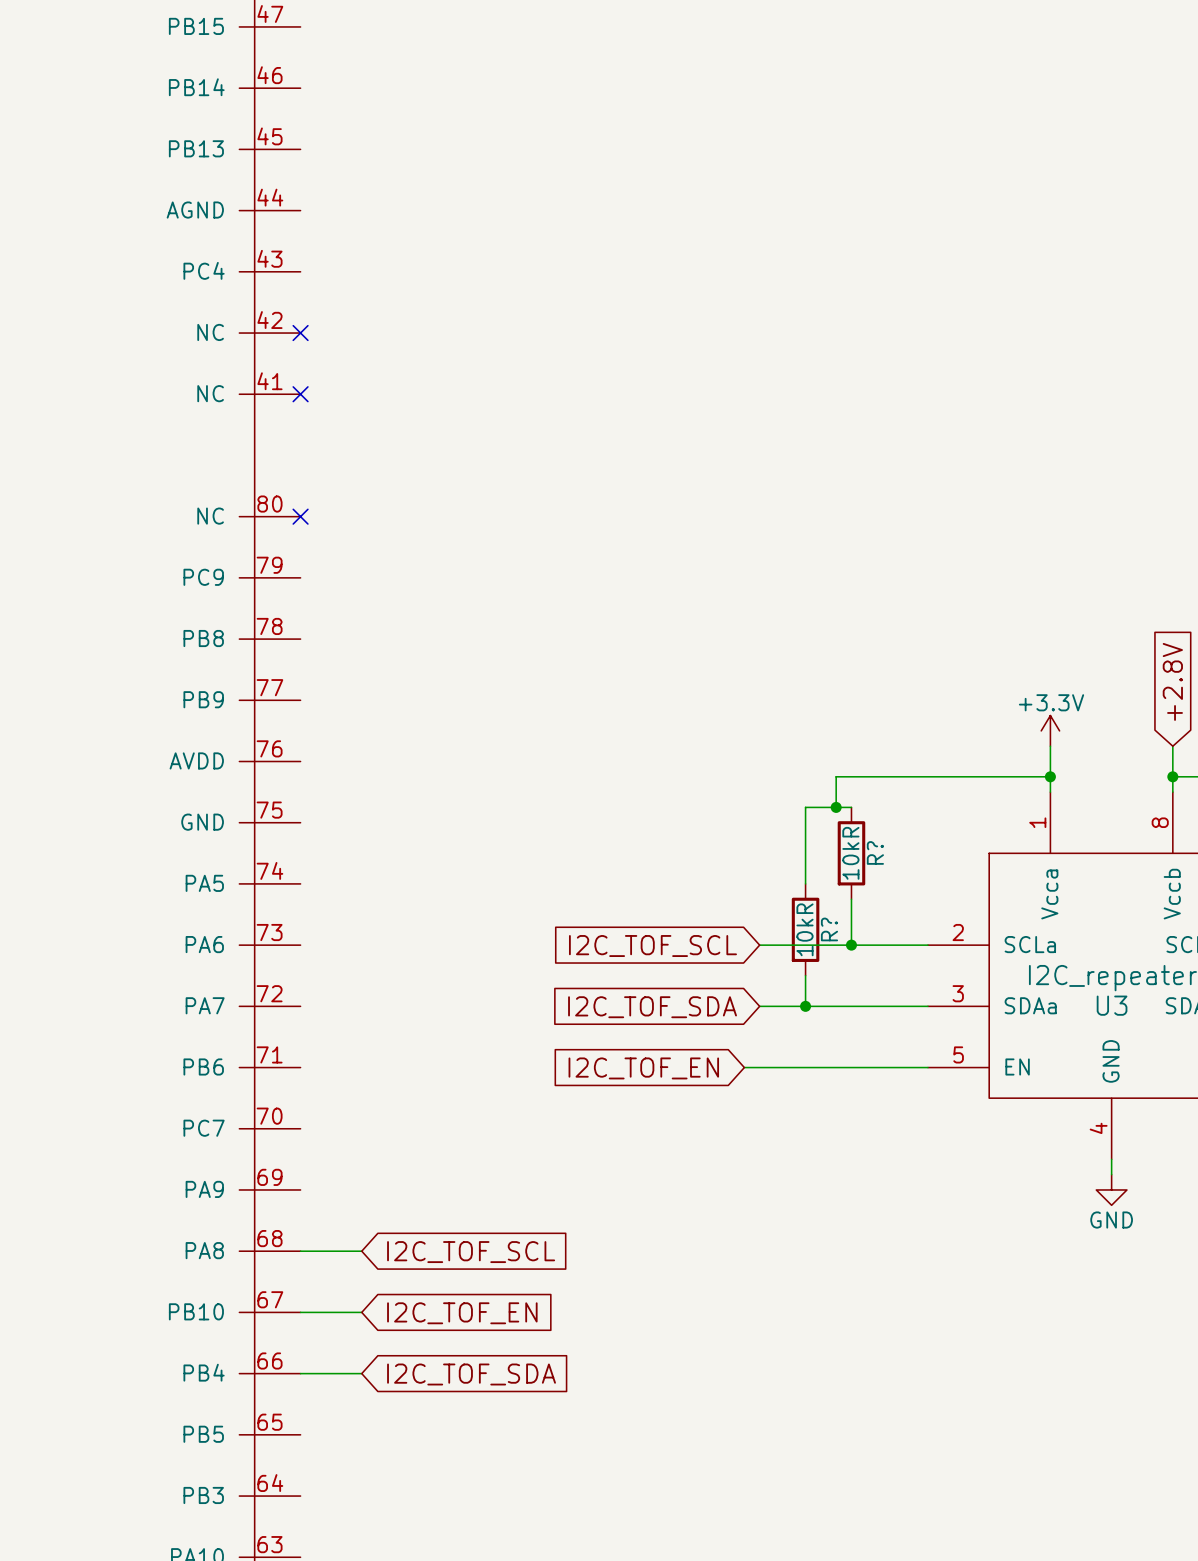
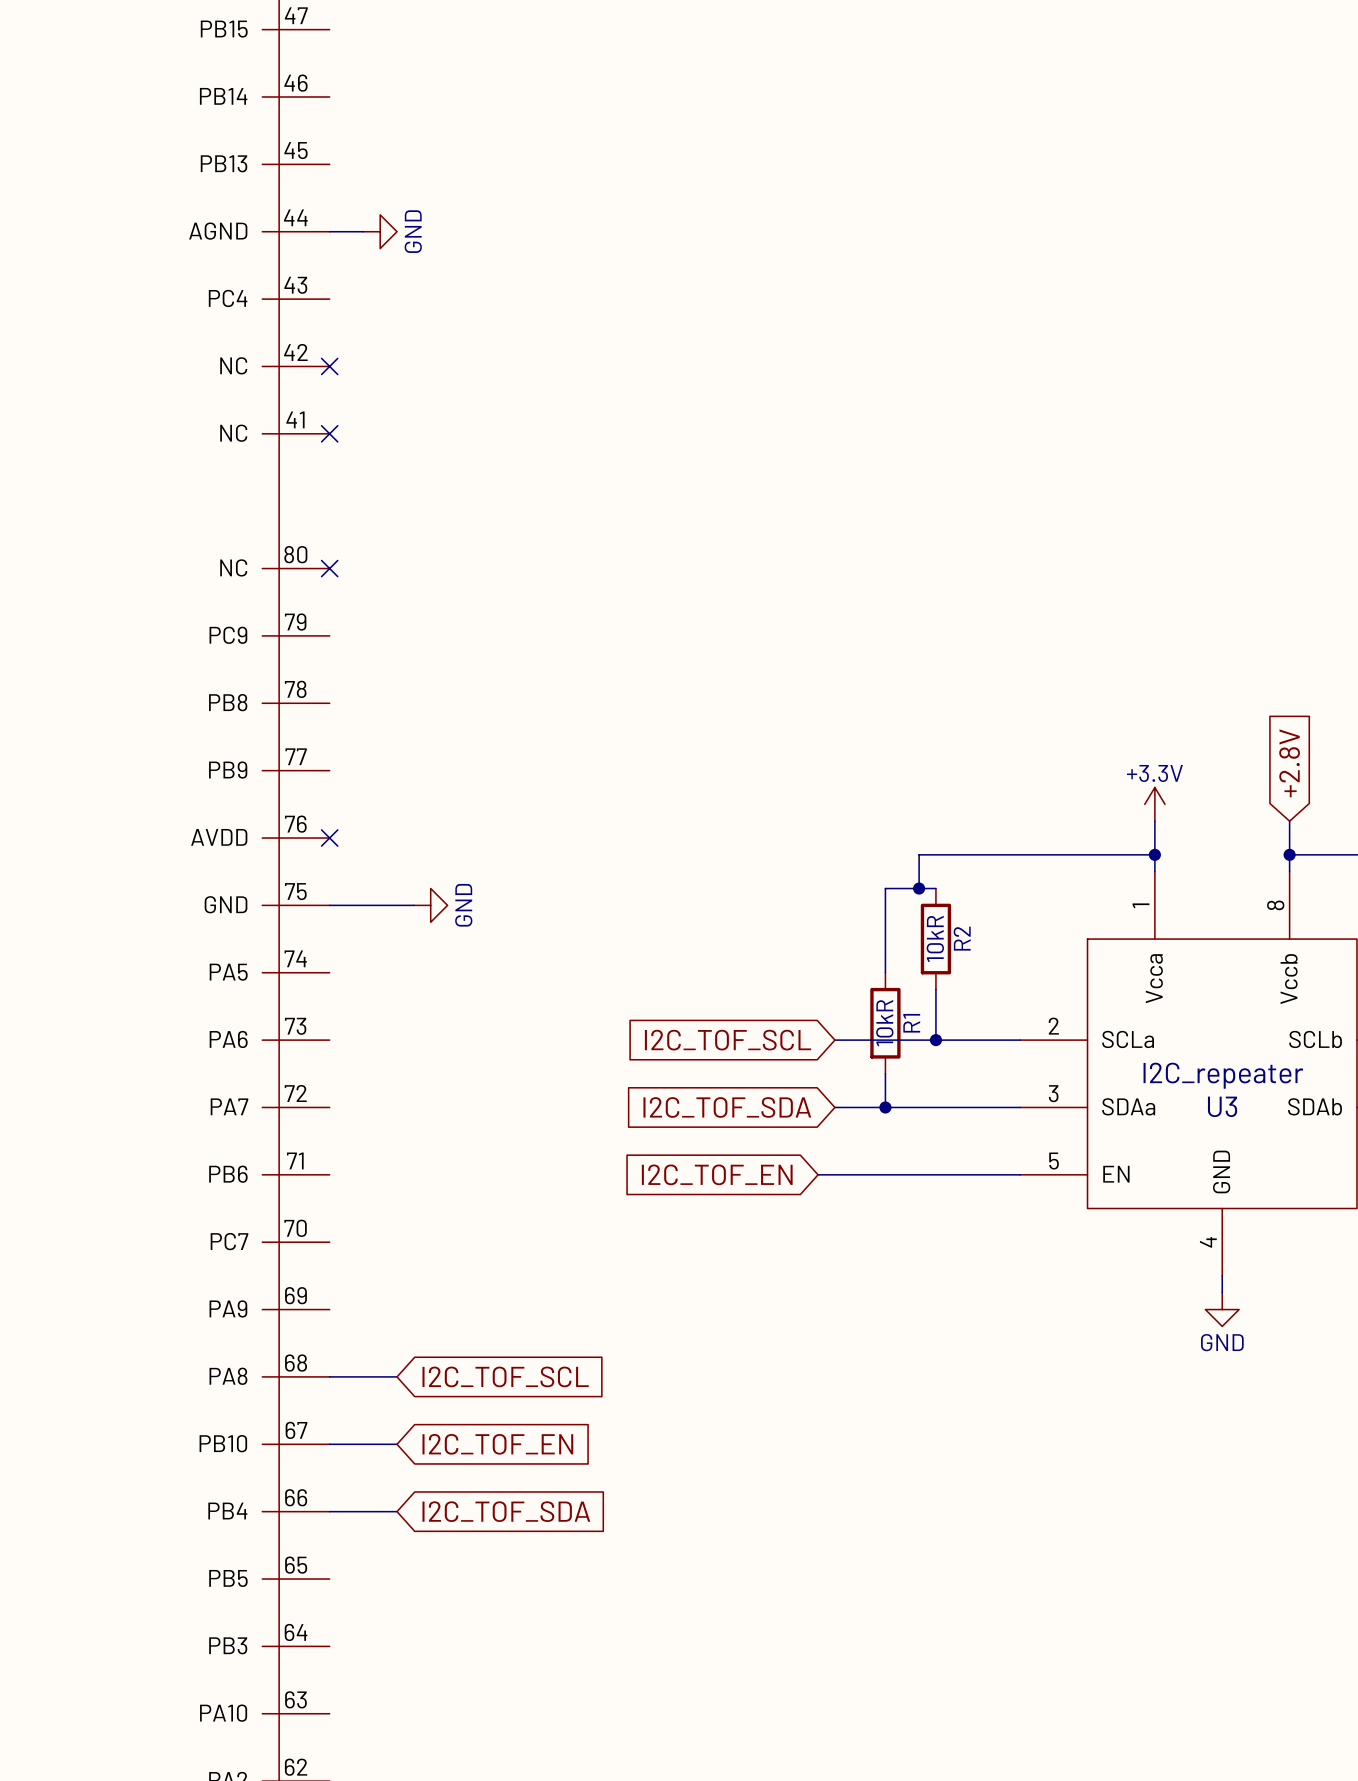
wire: none -> (329, 231) (363, 231)
power symbol: none -> GND (380, 231)
no-connect mark: none -> (329, 838)
wire: none -> (329, 905) (413, 905)
power symbol: none -> GND (430, 905)
R? name: R? (875, 852) -> R2 (962, 938)
R? name: R? (829, 929) -> R1 (911, 1023)

